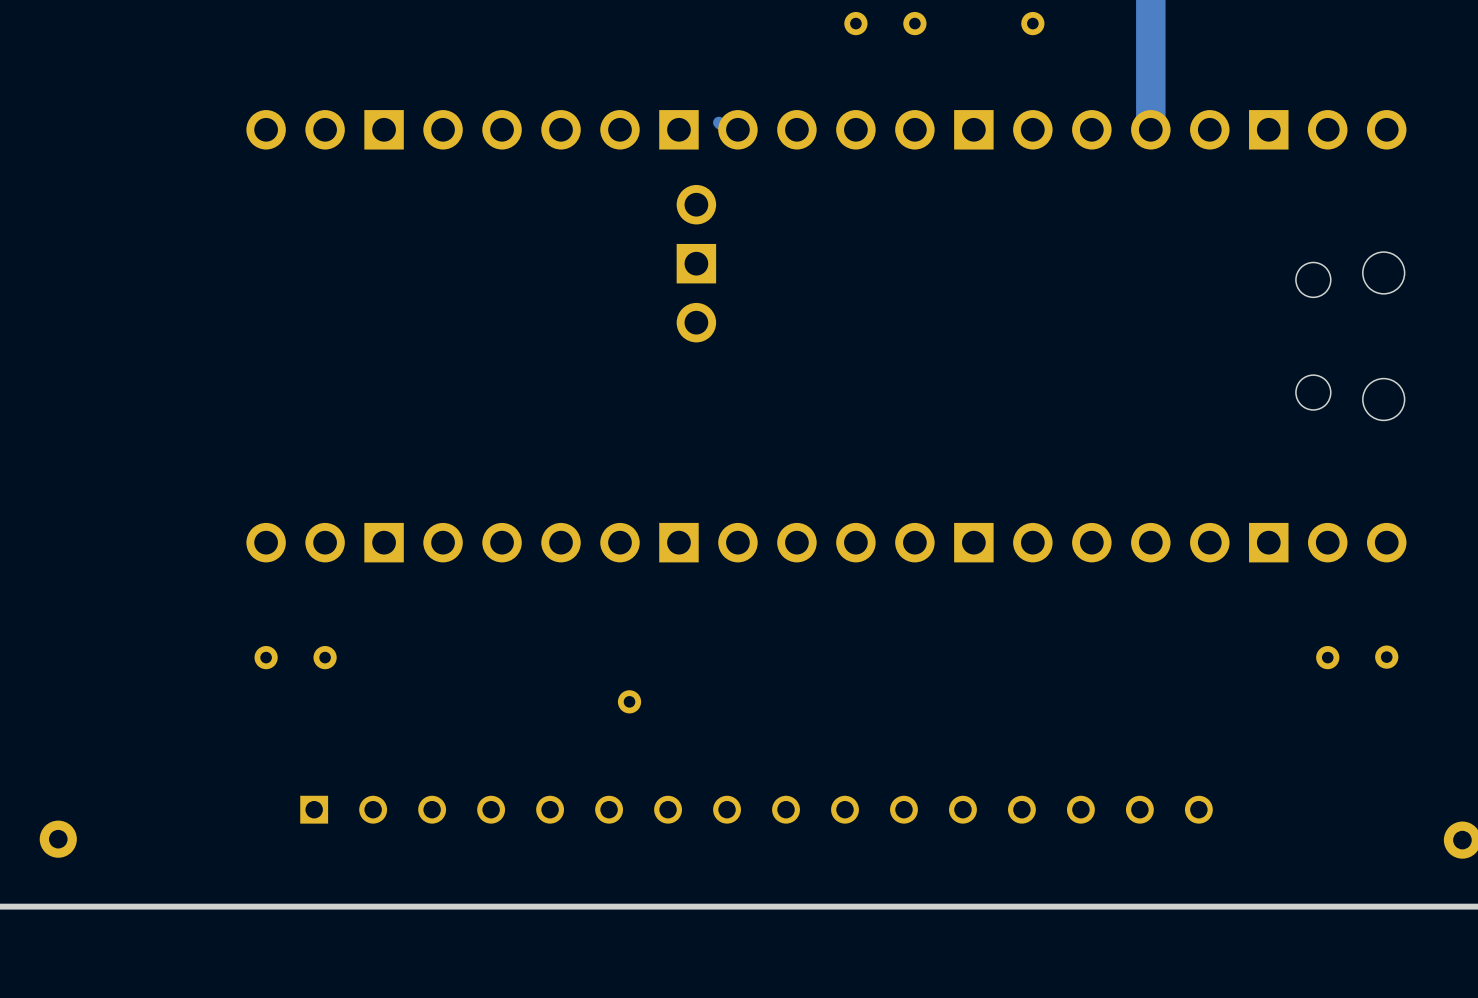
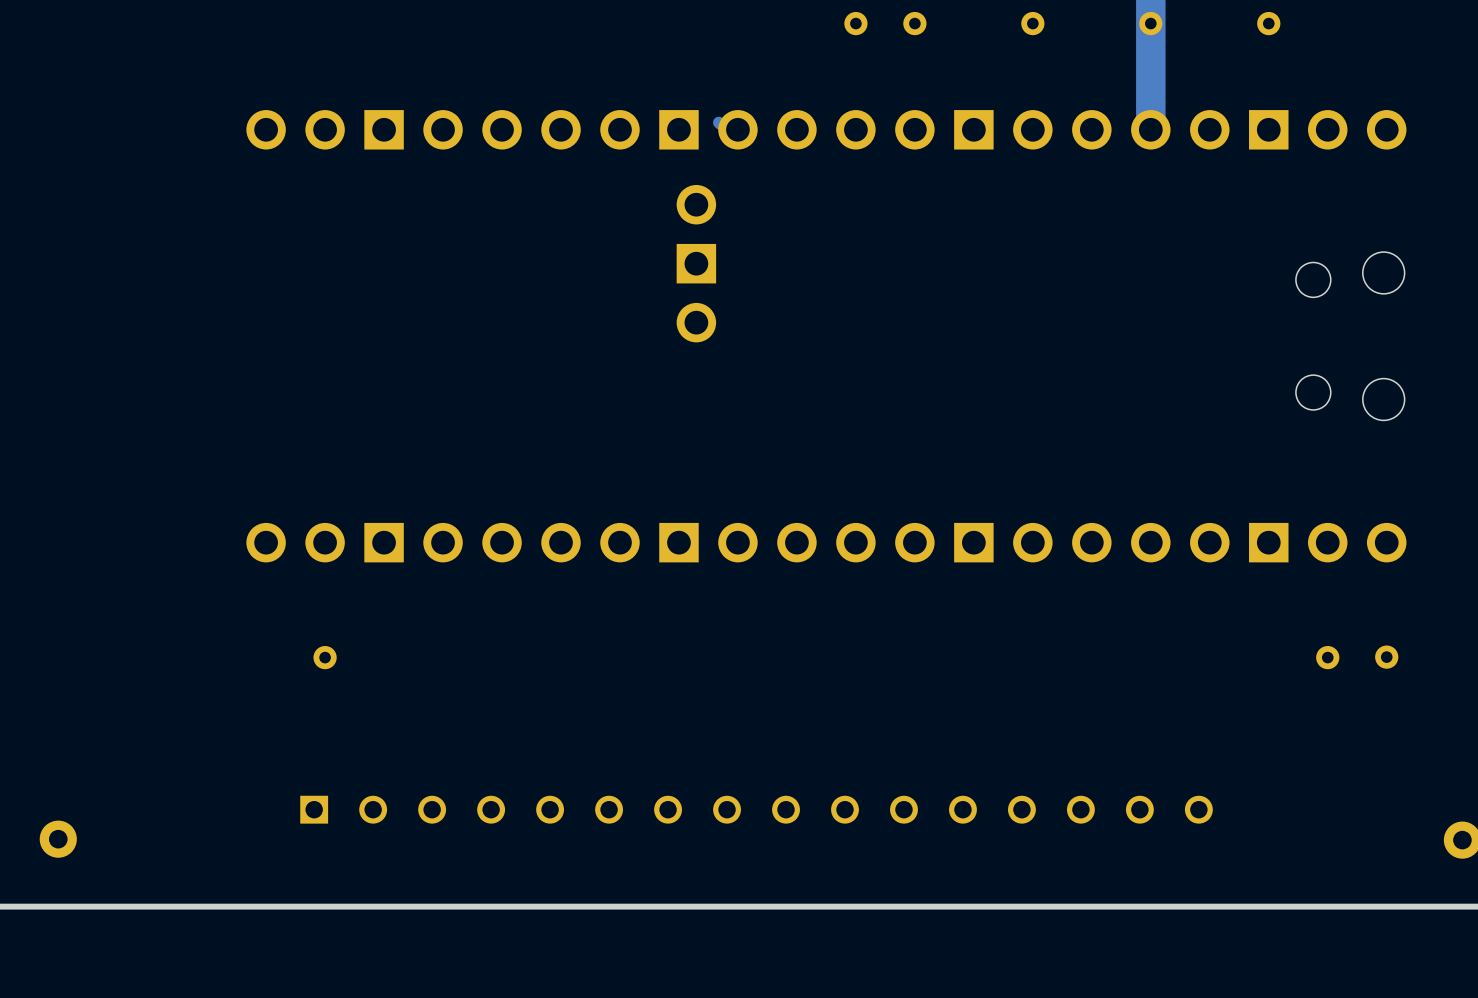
part: none -> (1150, 23)
part: none -> (1268, 23)
part: (266, 657) -> none
part: (629, 701) -> none

